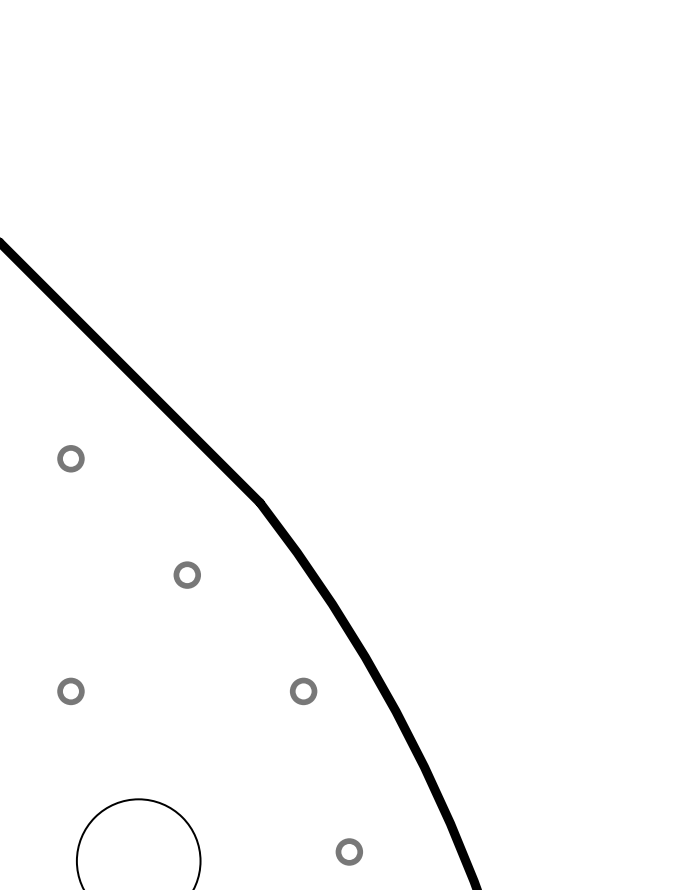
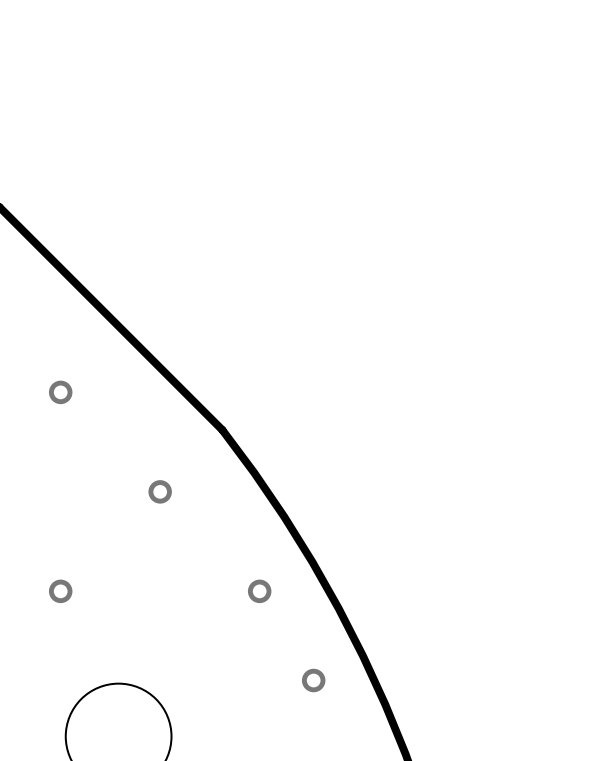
via: none -> (313, 680)
via: (349, 851) -> none

